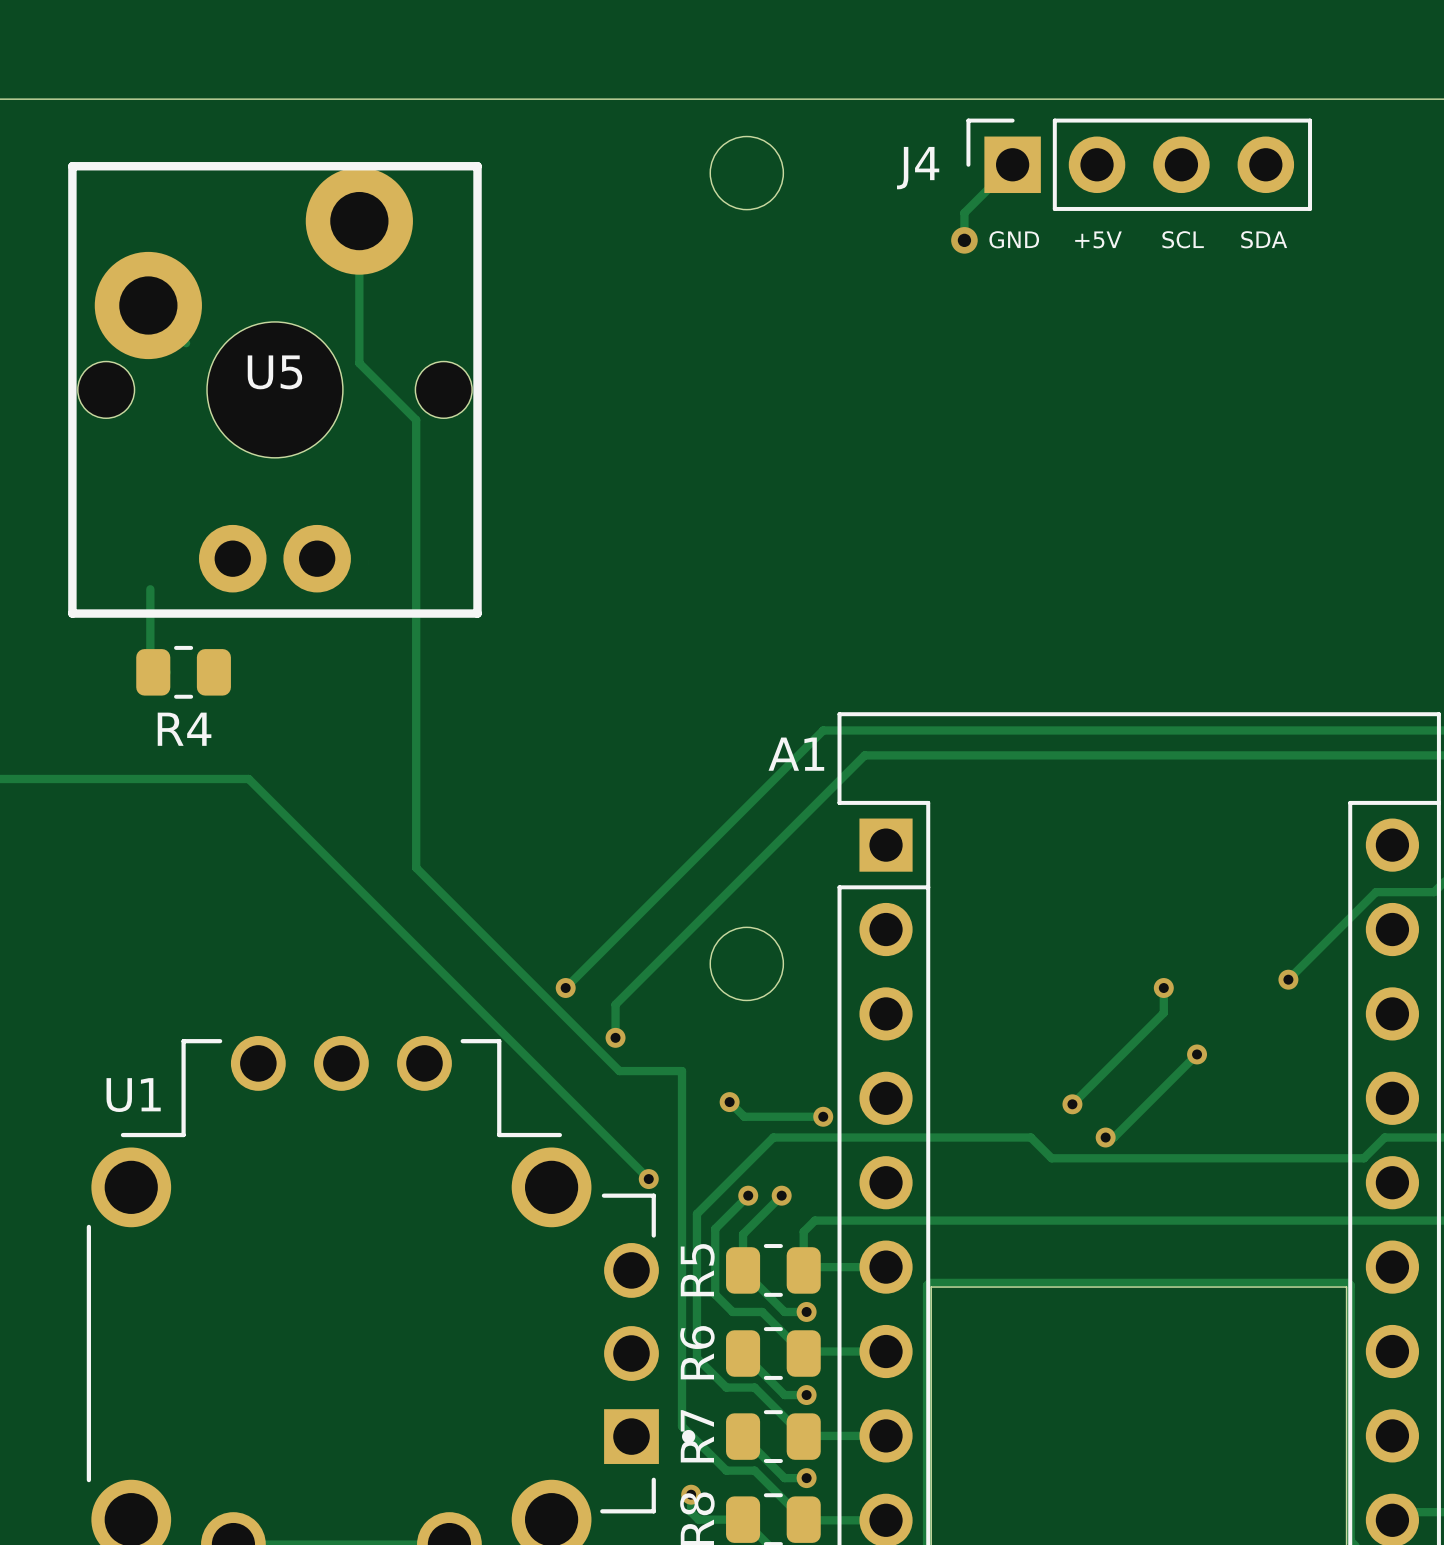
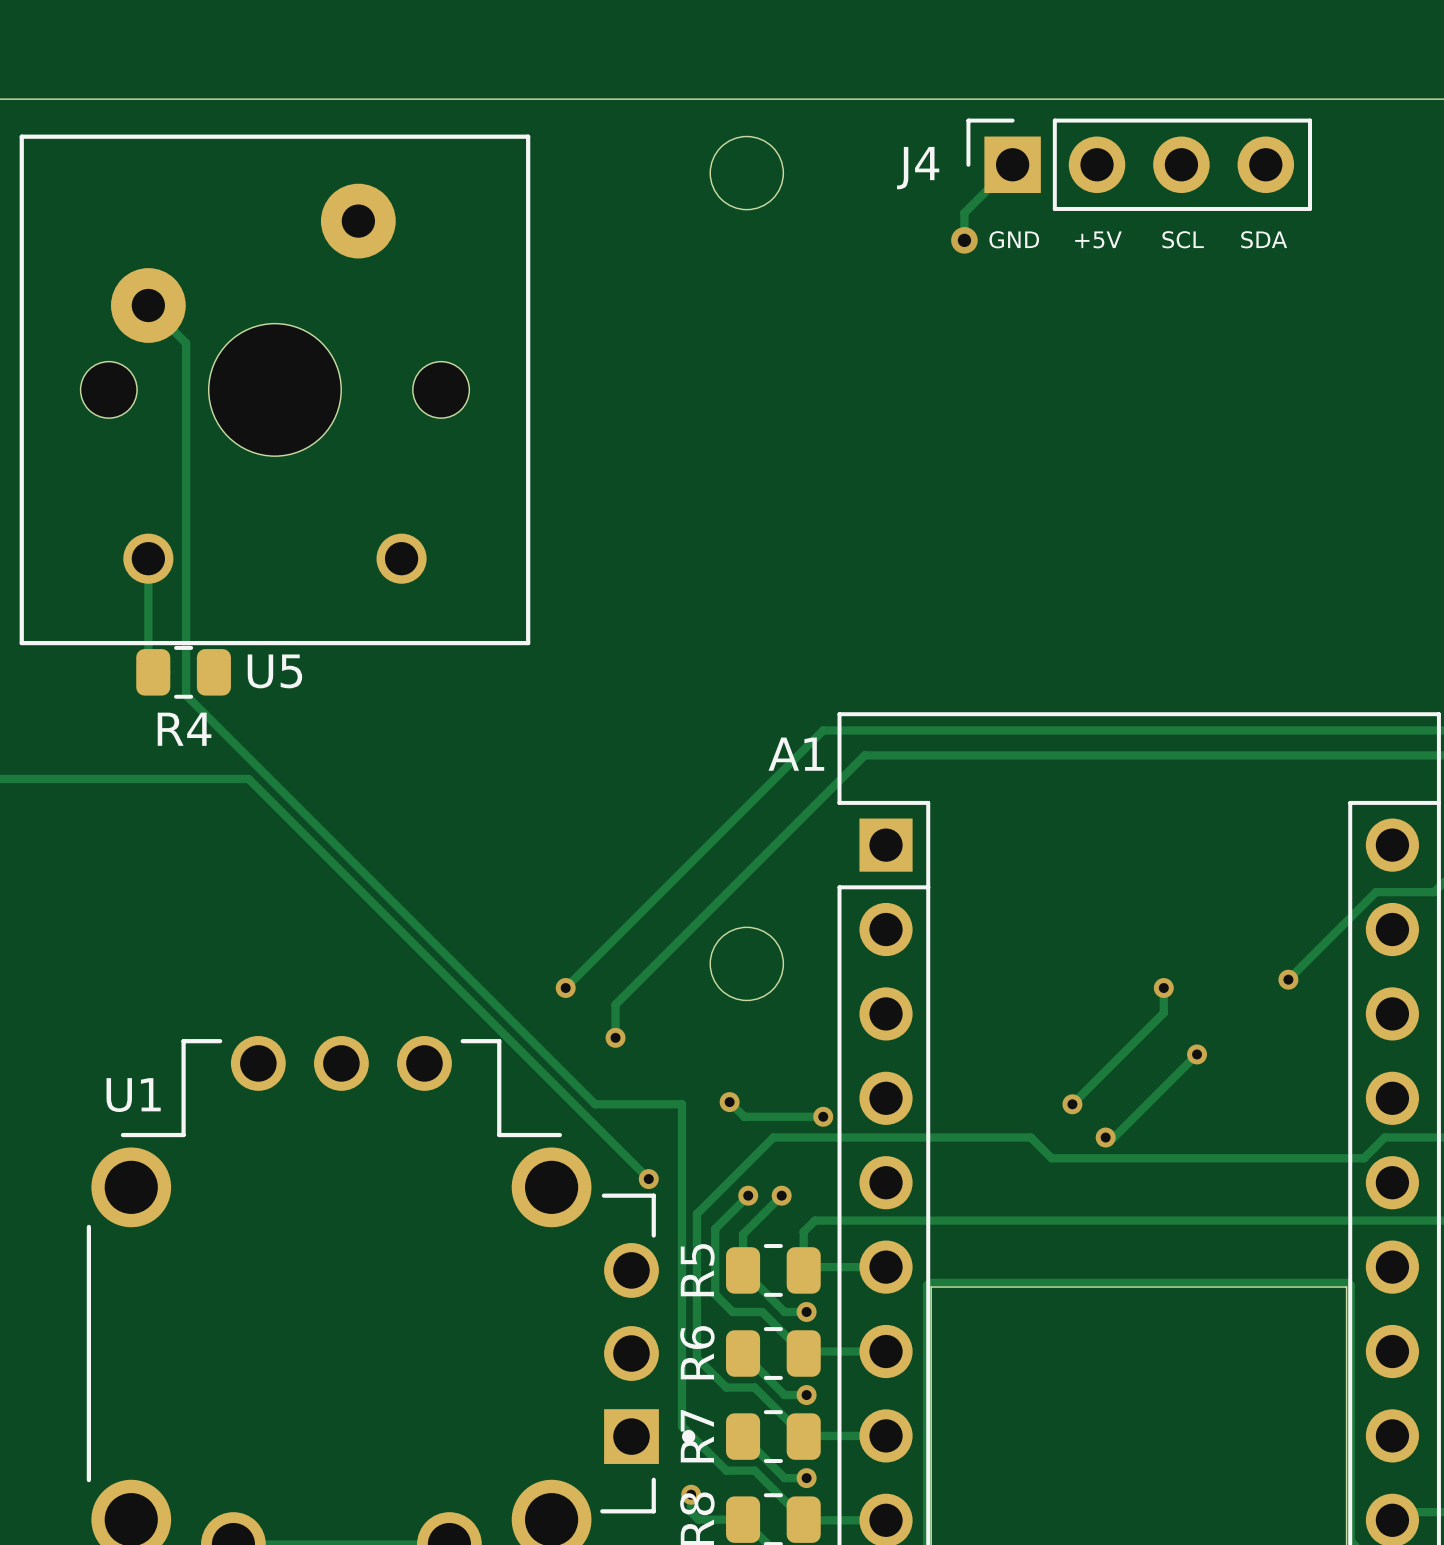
U5 footprint: [68, 162, 482, 618] -> [19, 134, 531, 646]
track: (359, 221) (359, 363) (416, 420) (416, 867) (619, 1071) (682, 1071) (682, 1104) -> (186, 343) (186, 695) (595, 1104) (682, 1104)
U5 name position: U5 (274, 372) -> U5 (274, 671)
track: (150, 589) (150, 656) -> (148, 558) (148, 654) (150, 656)

